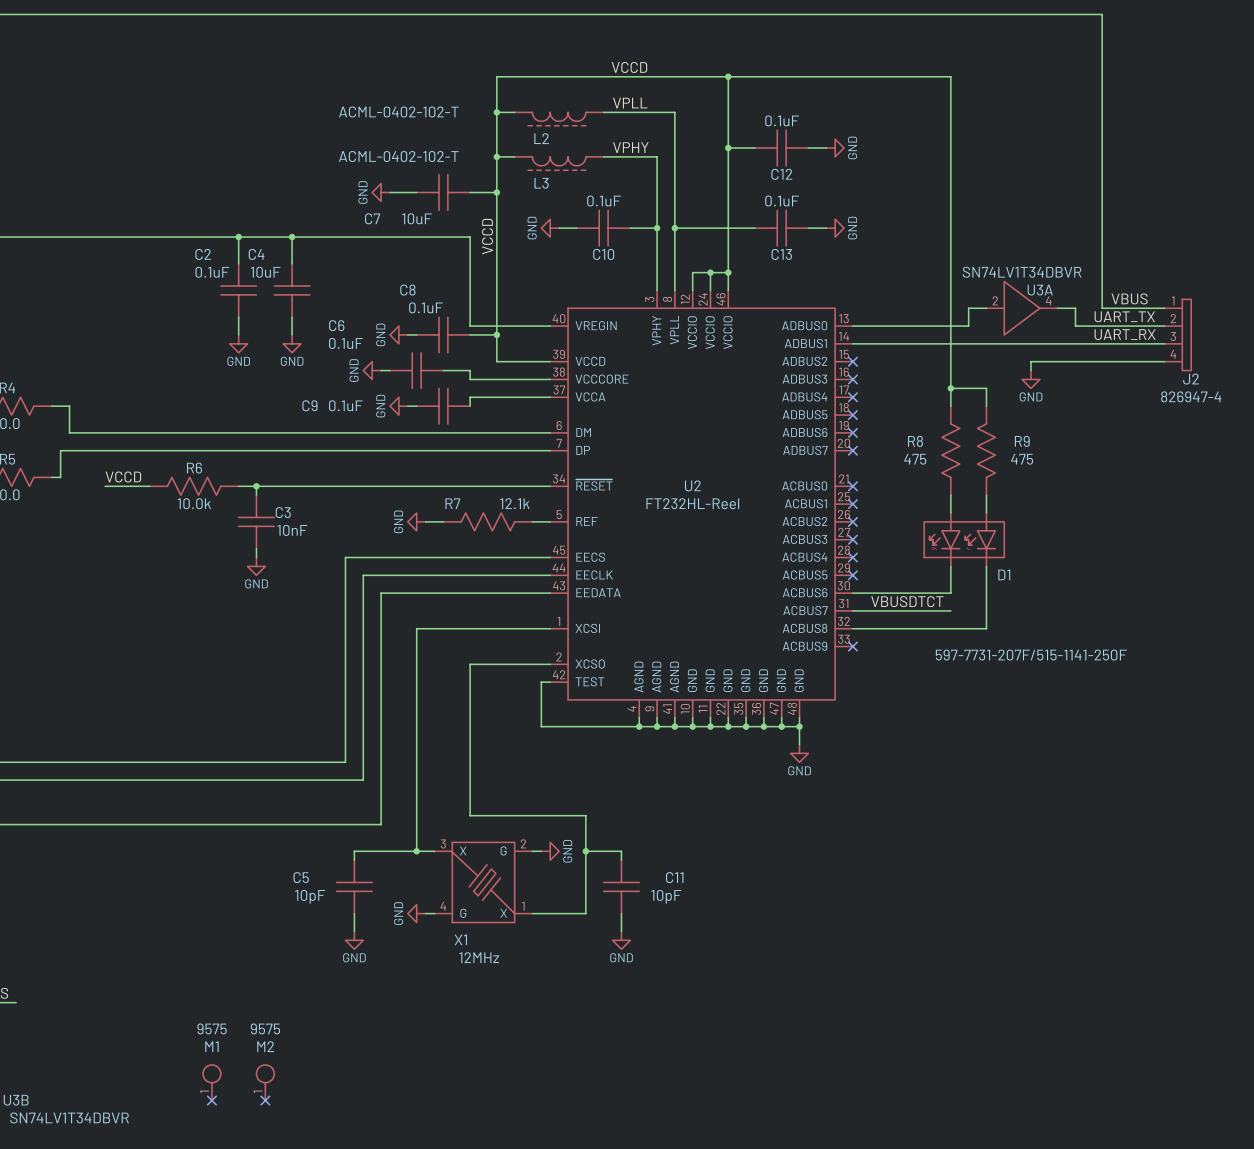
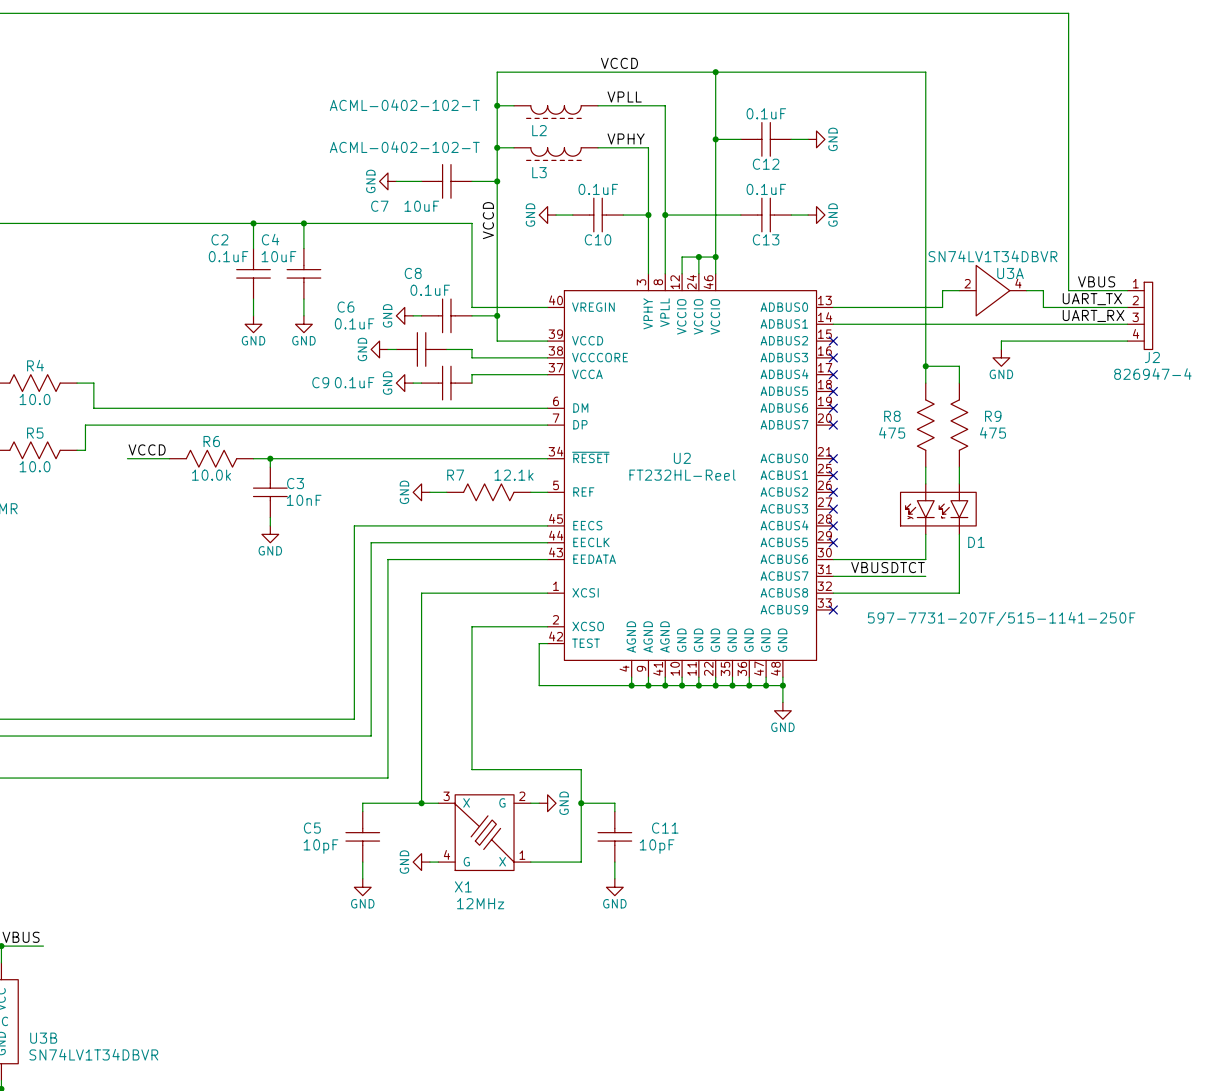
M1: 9575 (211, 1082) -> none
M2: 9575 (265, 1082) -> none
no-connect mark: (211, 1100) -> none
no-connect mark: (265, 1100) -> none

